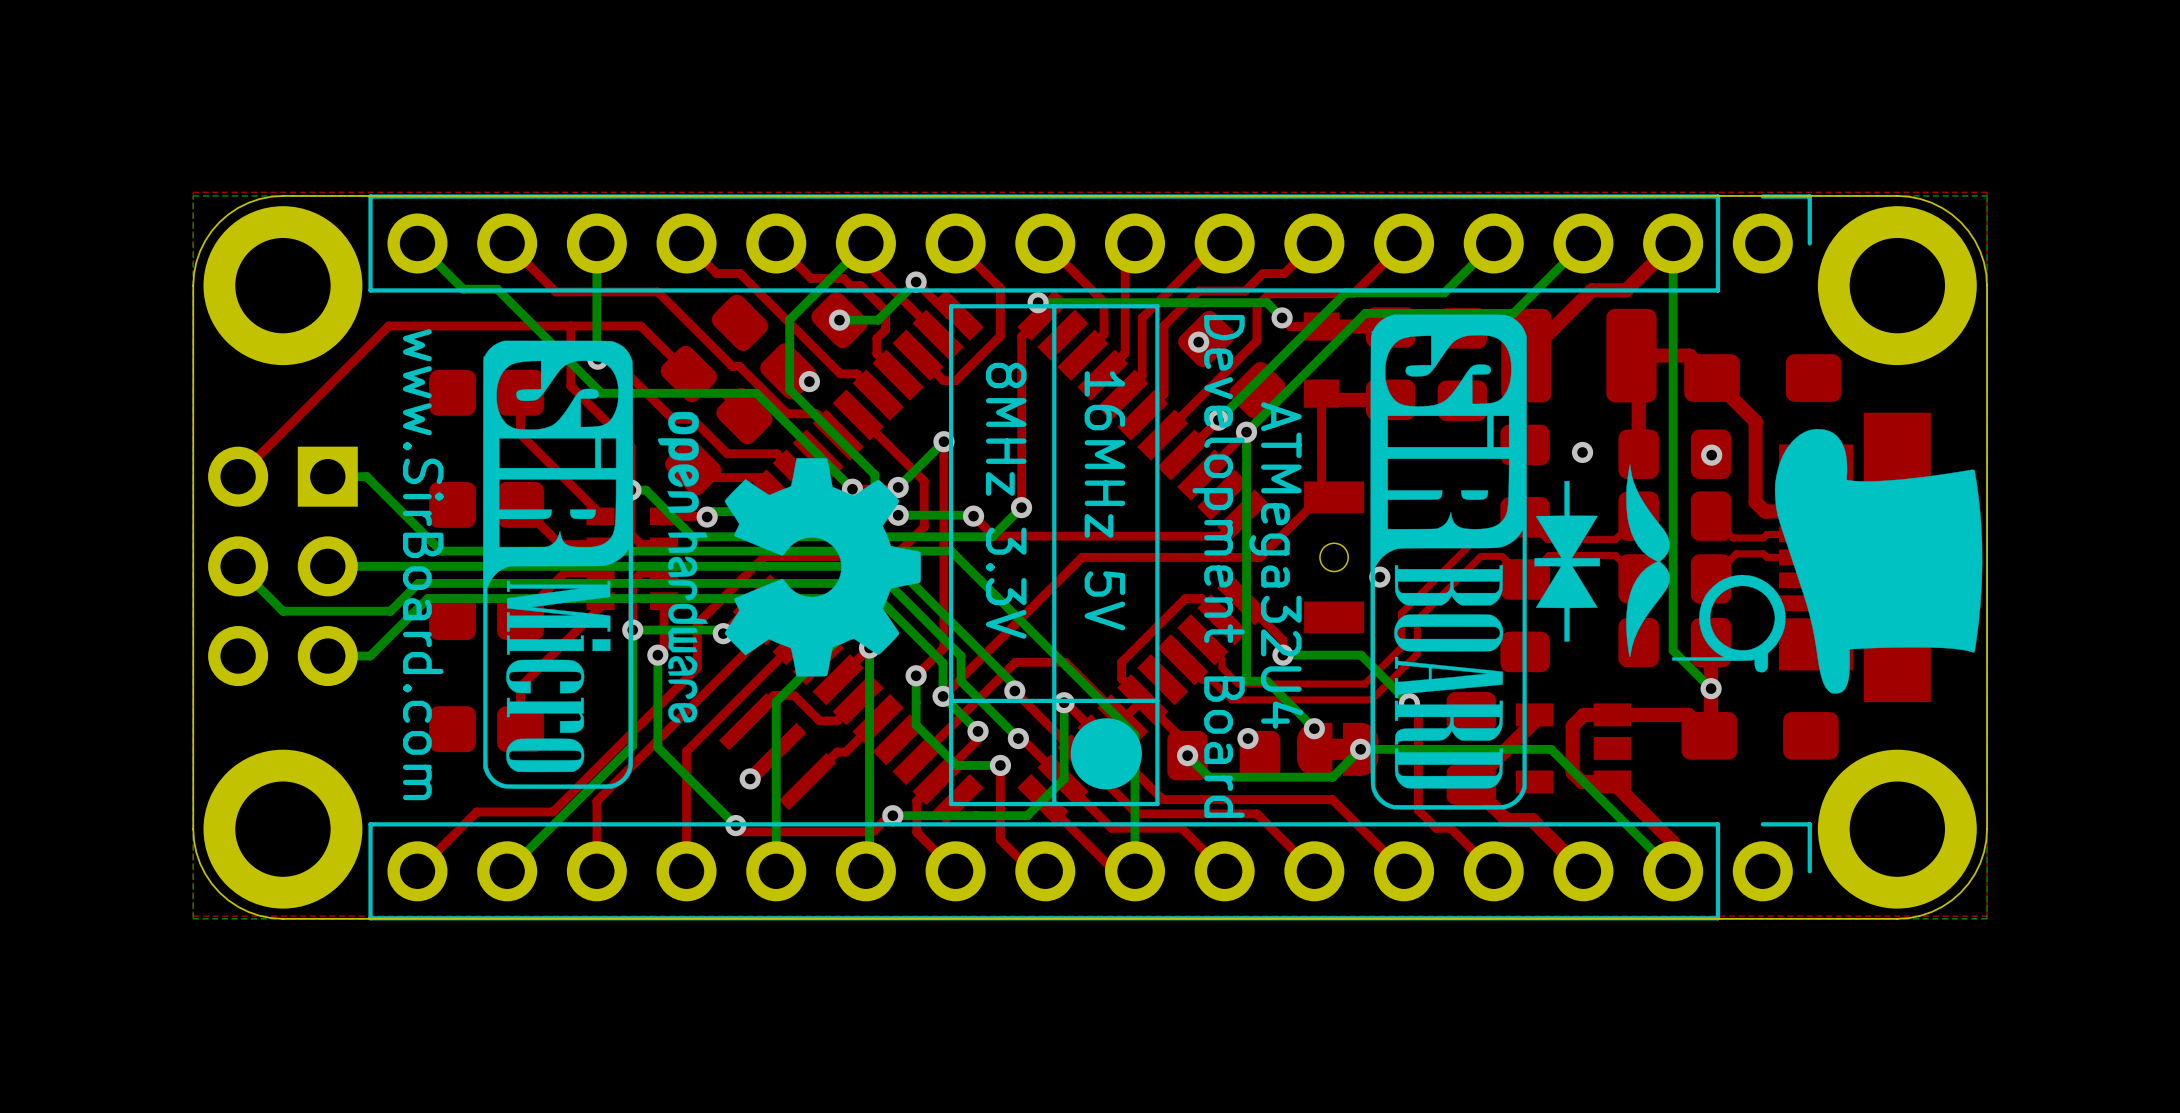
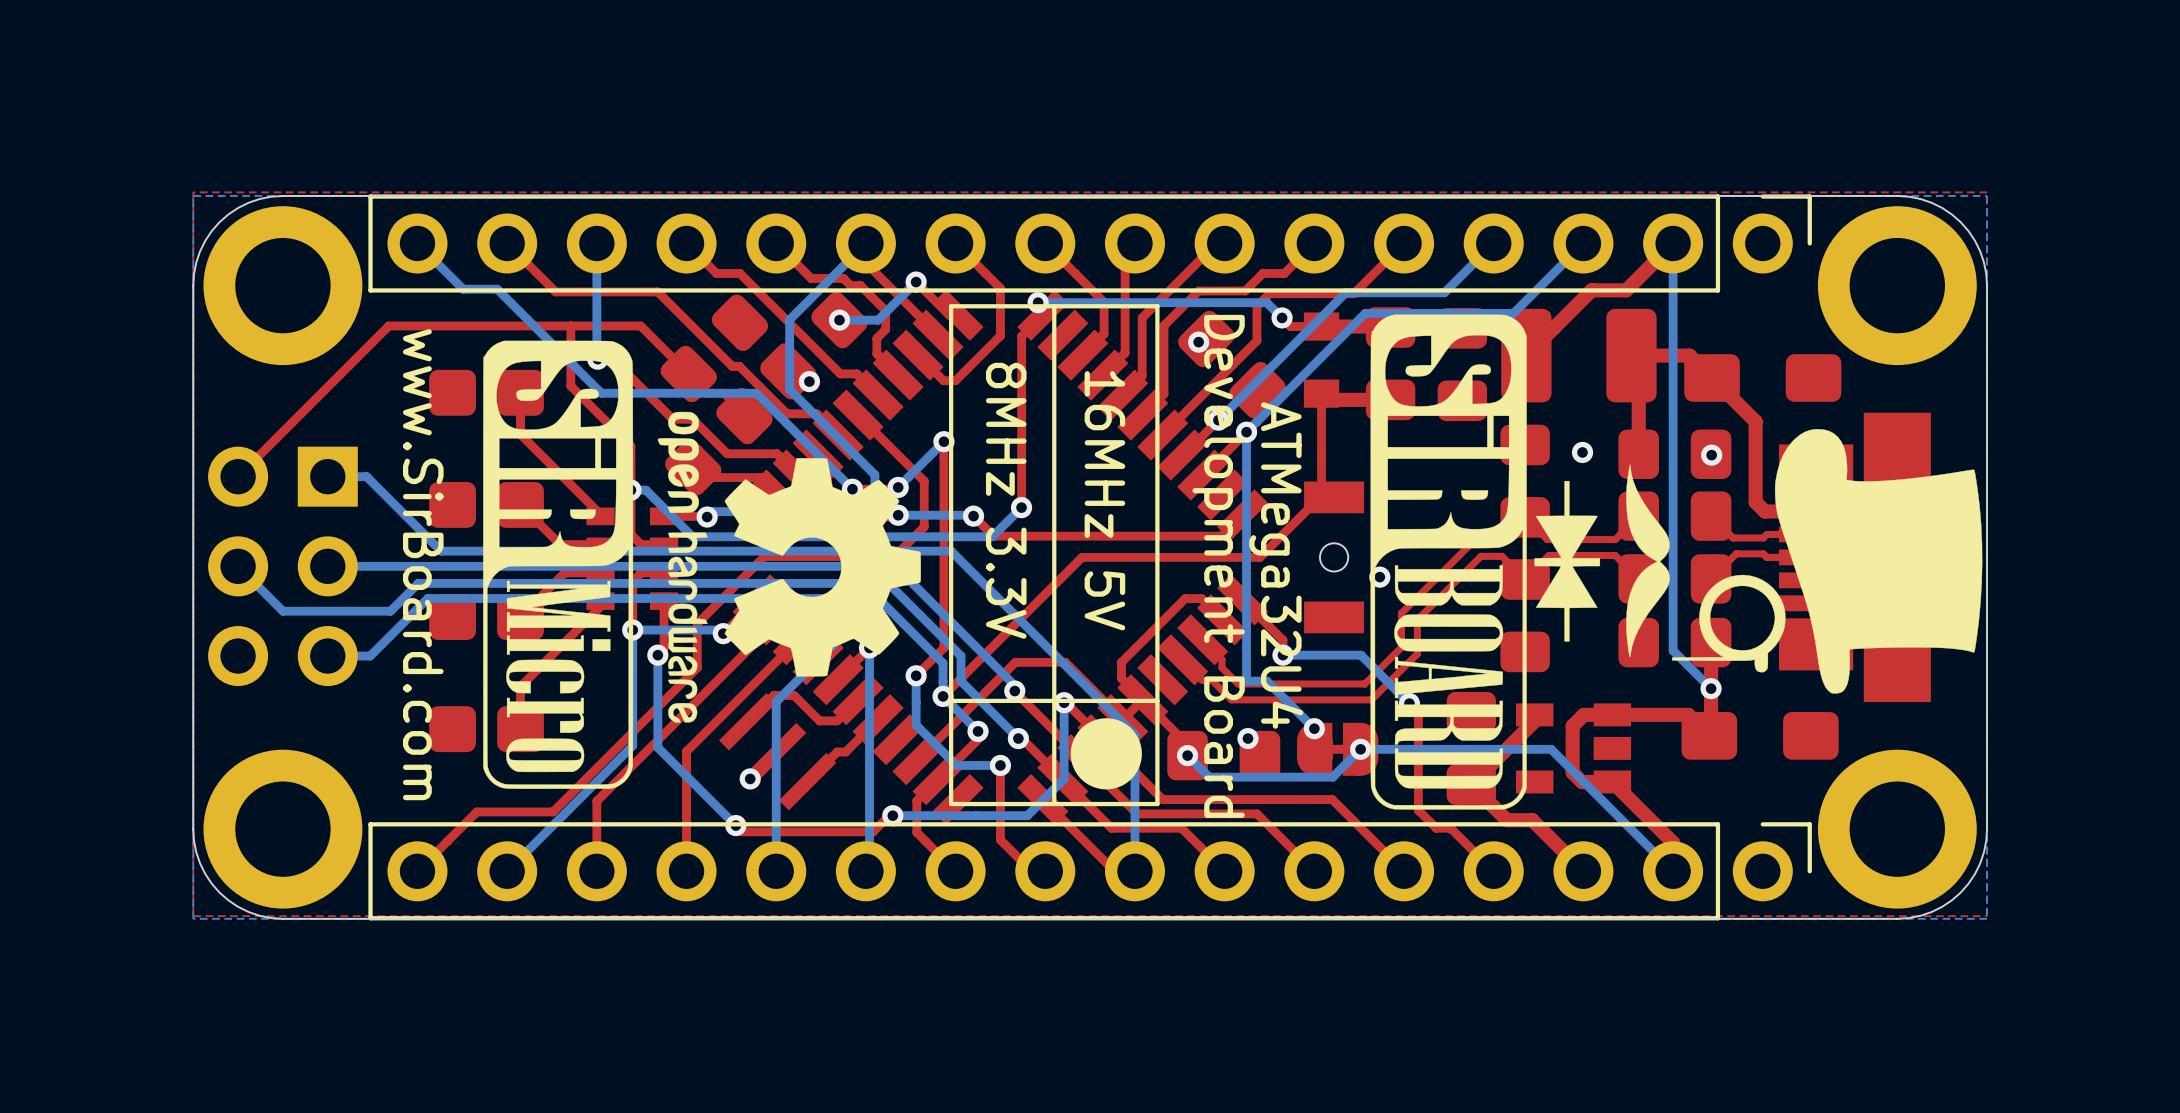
part footprint: [1297, 722, 1379, 776] -> [1297, 722, 1379, 776]

